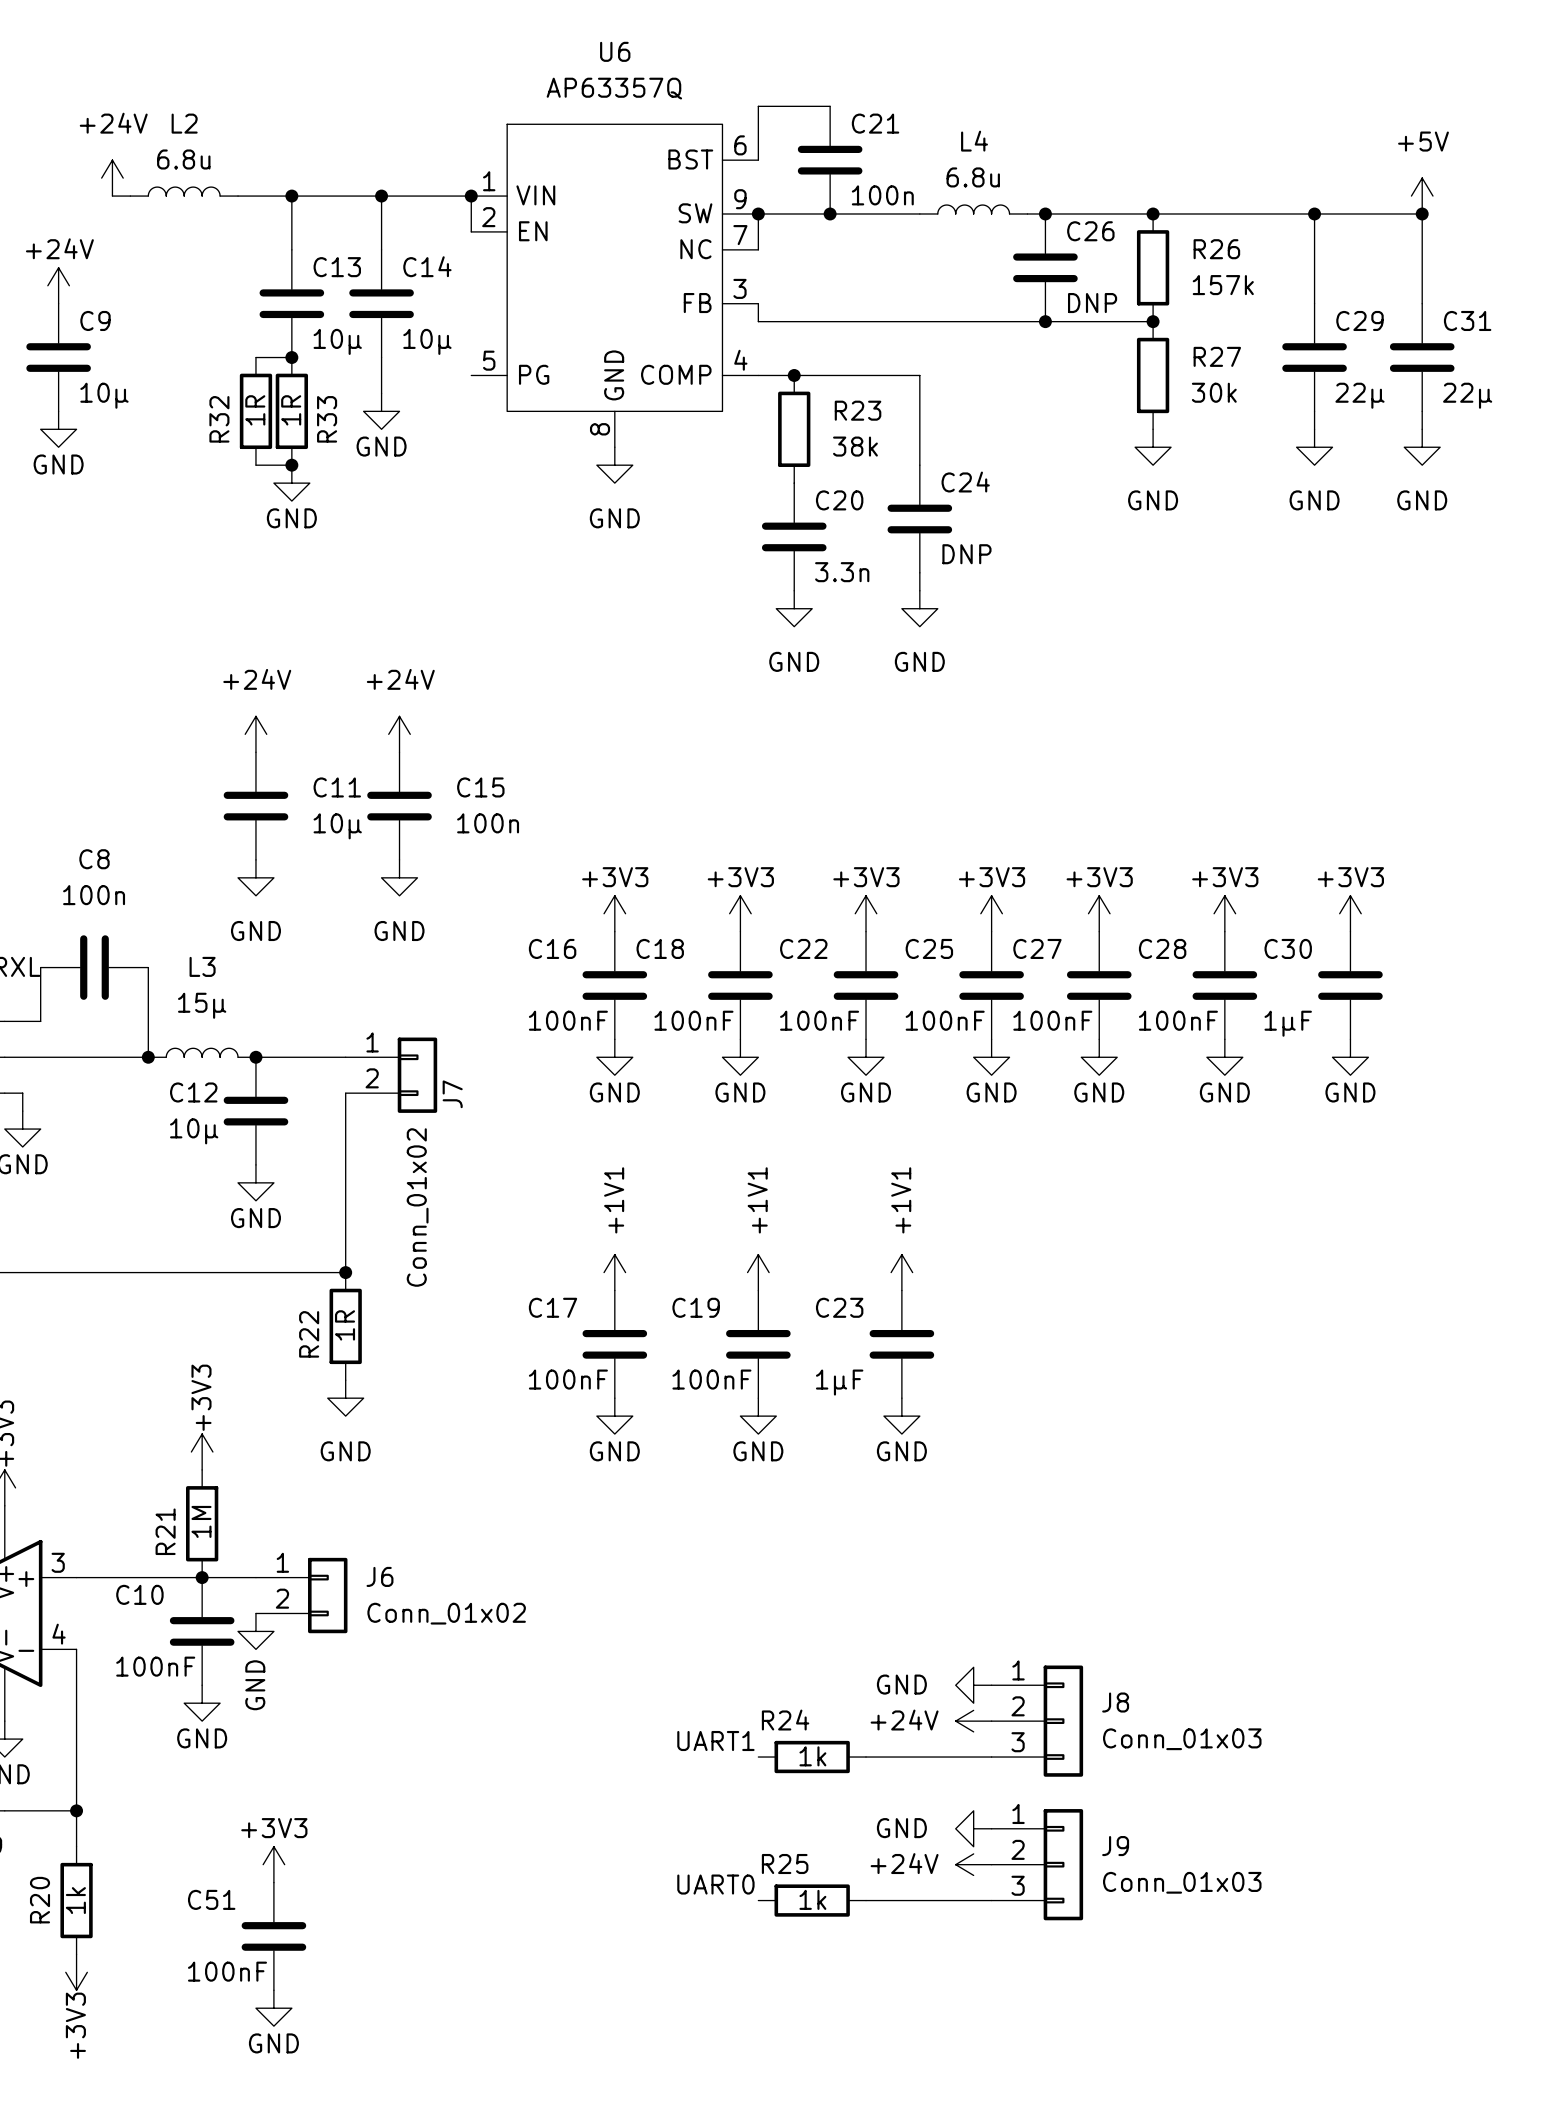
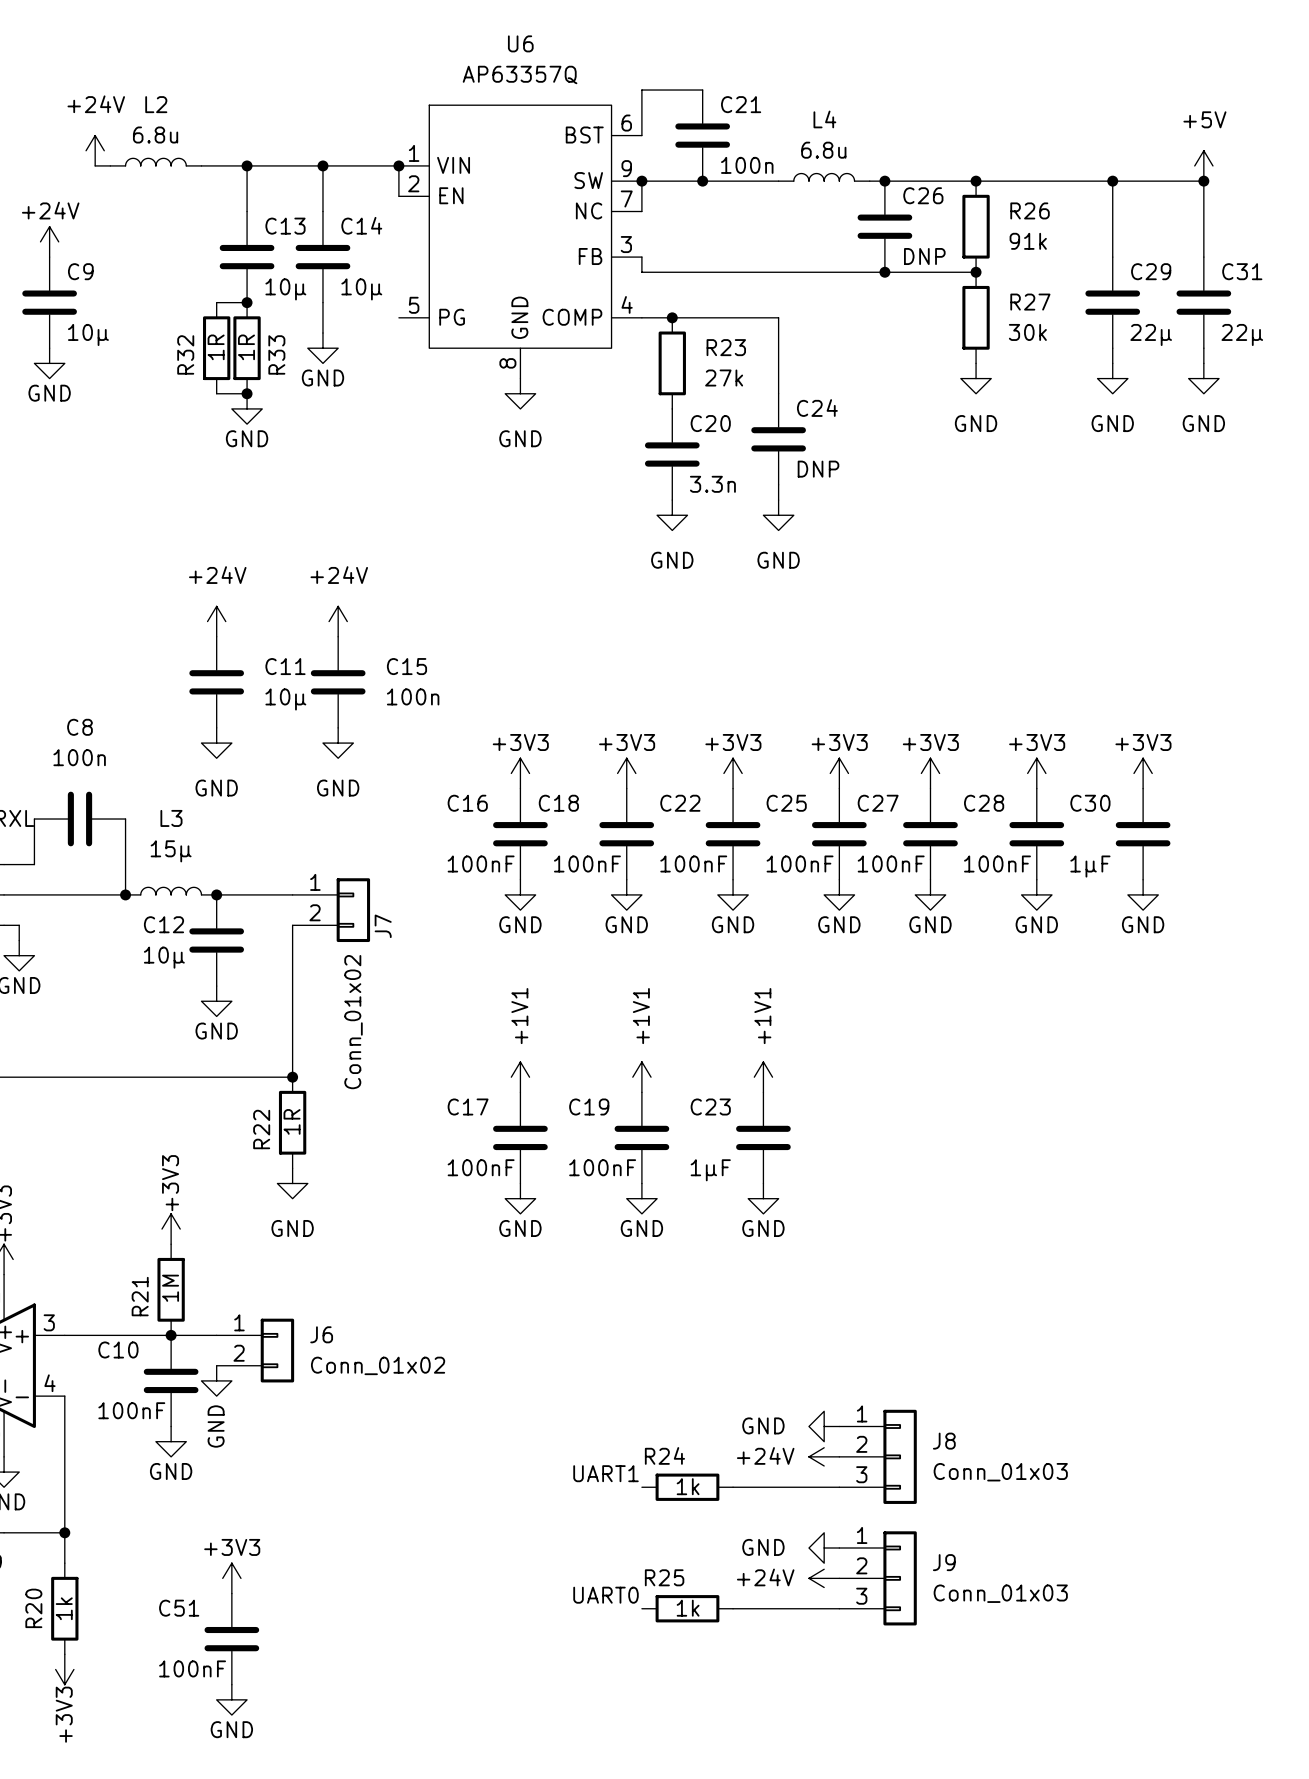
R26 value: 157k (1223, 285) -> 91k (1028, 241)
R23 value: 38k (855, 446) -> 27k (724, 378)

